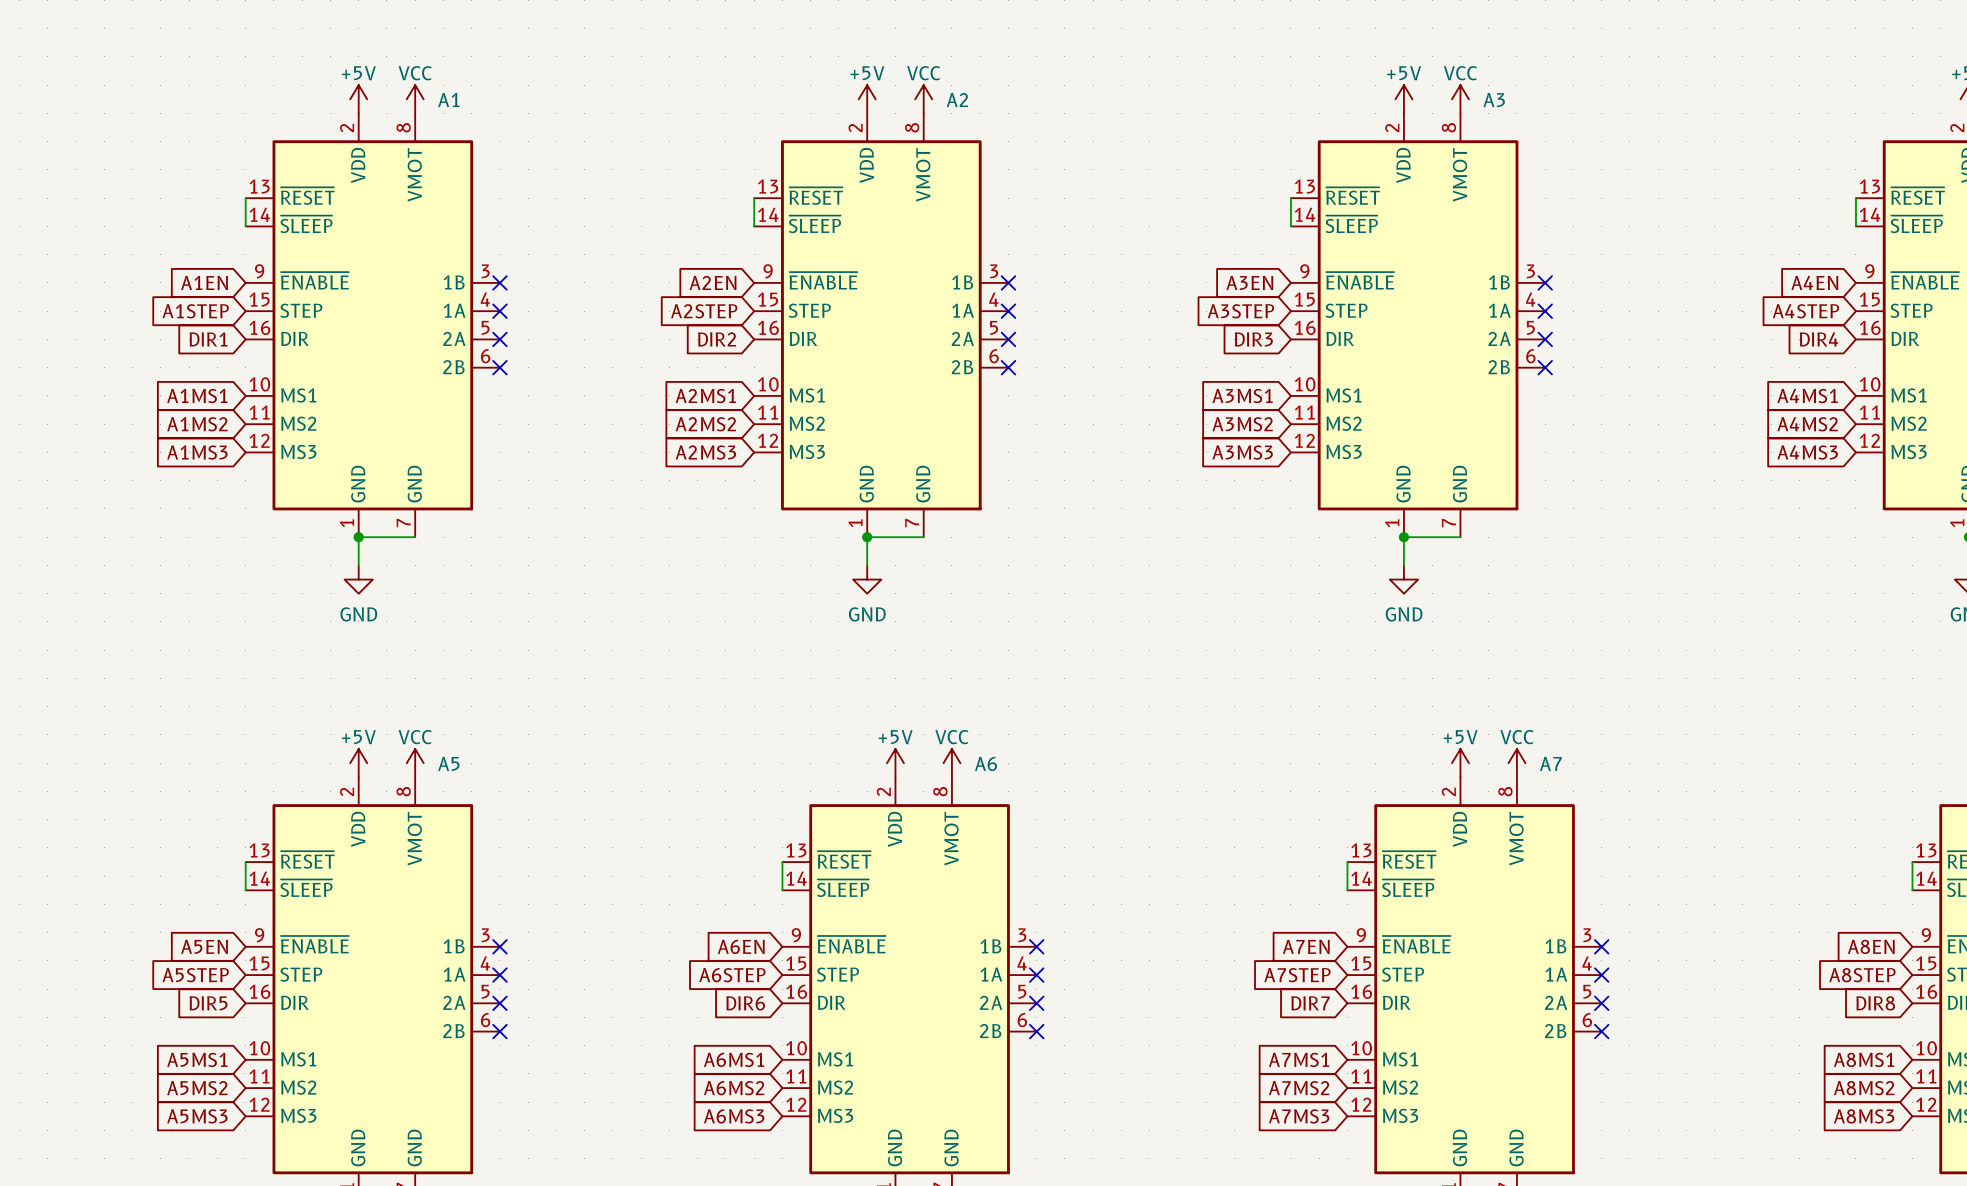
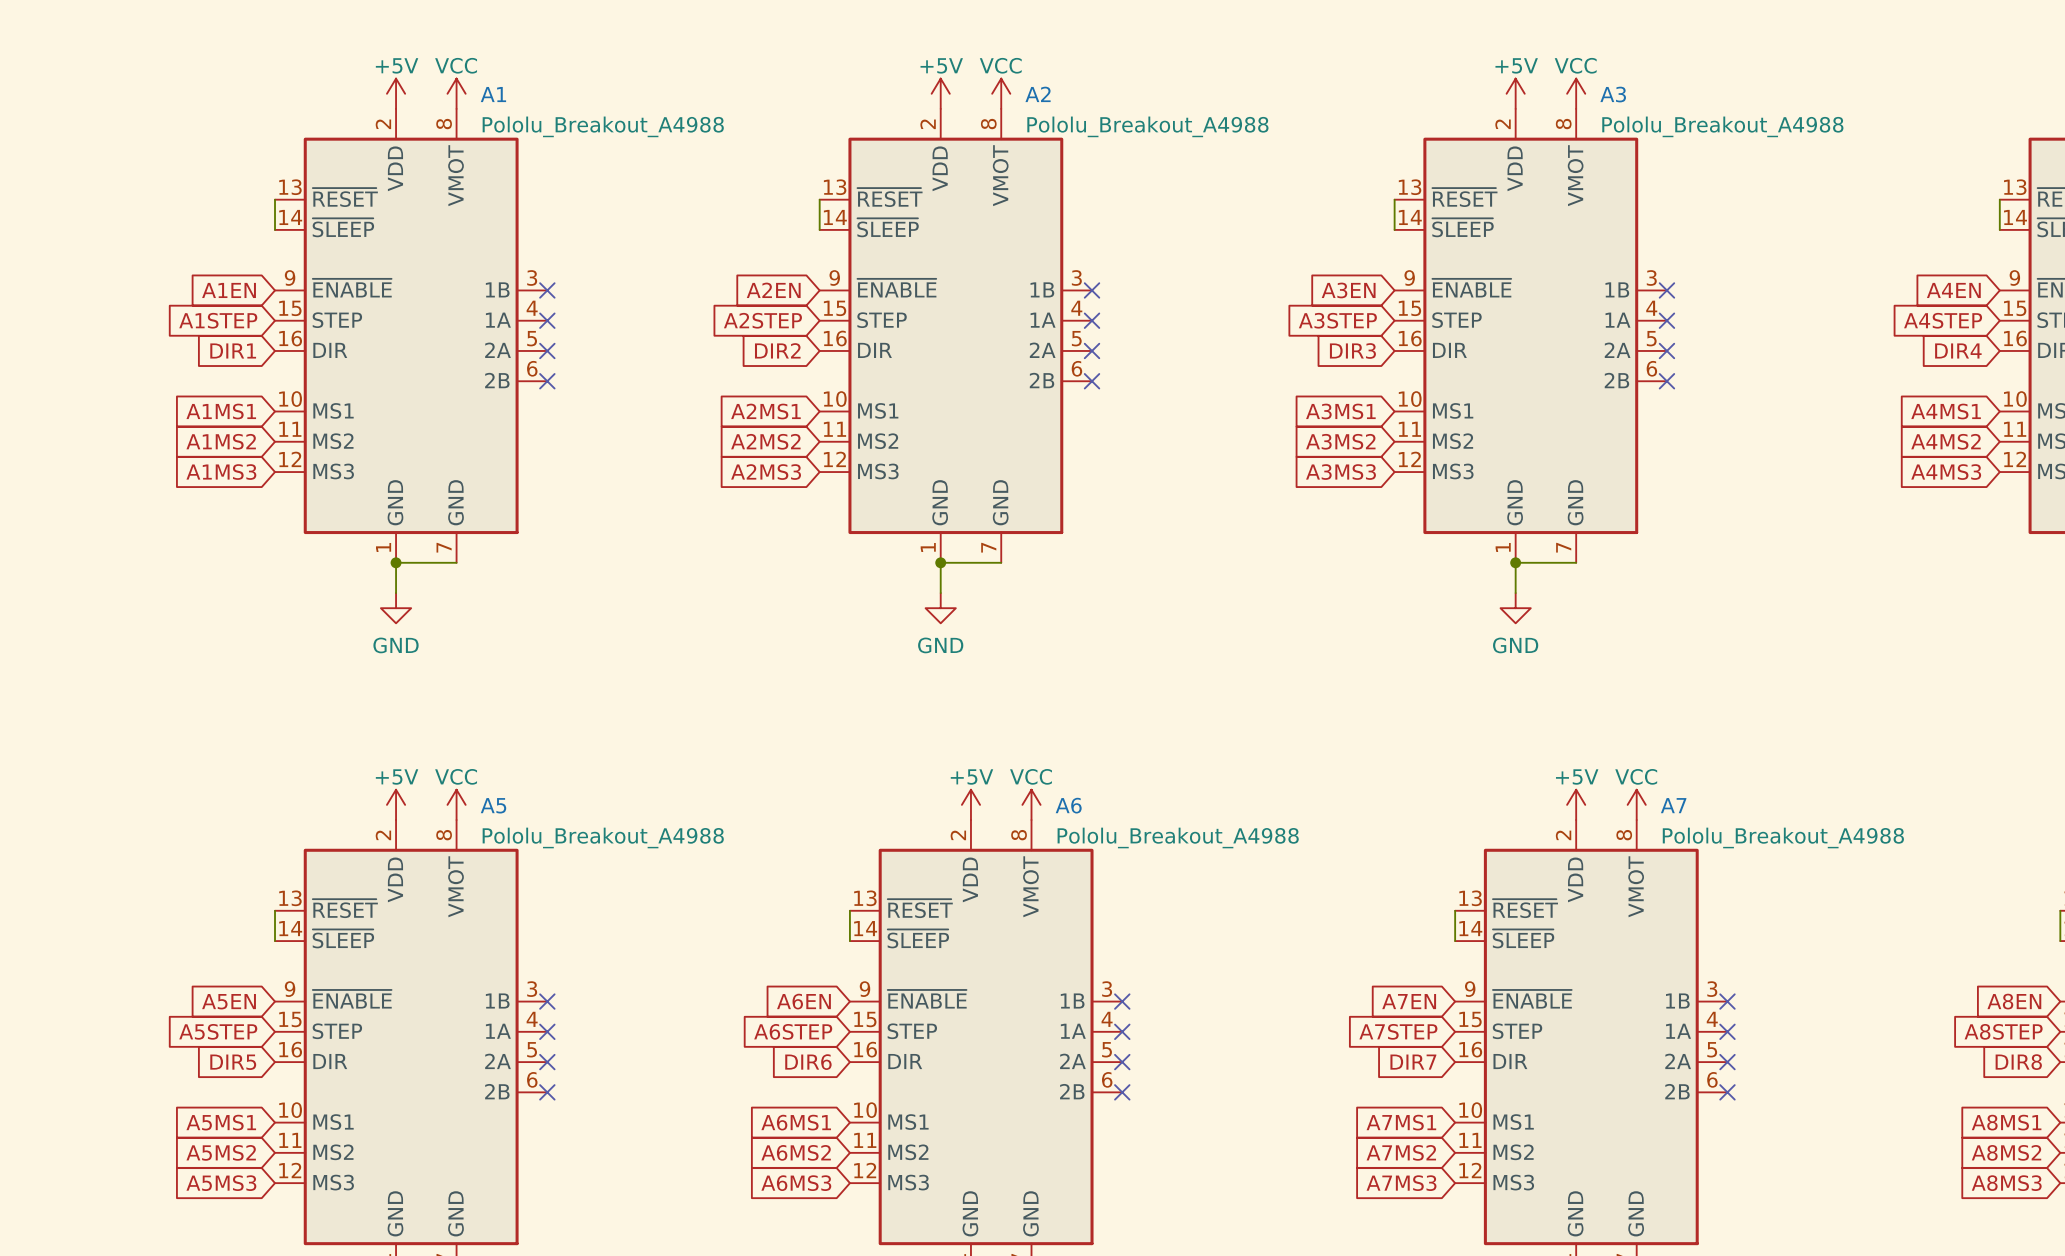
A1 value: none -> Pololu_Breakout_A4988 (603, 126)
A2 value: none -> Pololu_Breakout_A4988 (1147, 126)
A3 value: none -> Pololu_Breakout_A4988 (1722, 126)
A5 value: none -> Pololu_Breakout_A4988 (603, 837)
A6 value: none -> Pololu_Breakout_A4988 (1178, 837)
A7 value: none -> Pololu_Breakout_A4988 (1783, 837)

